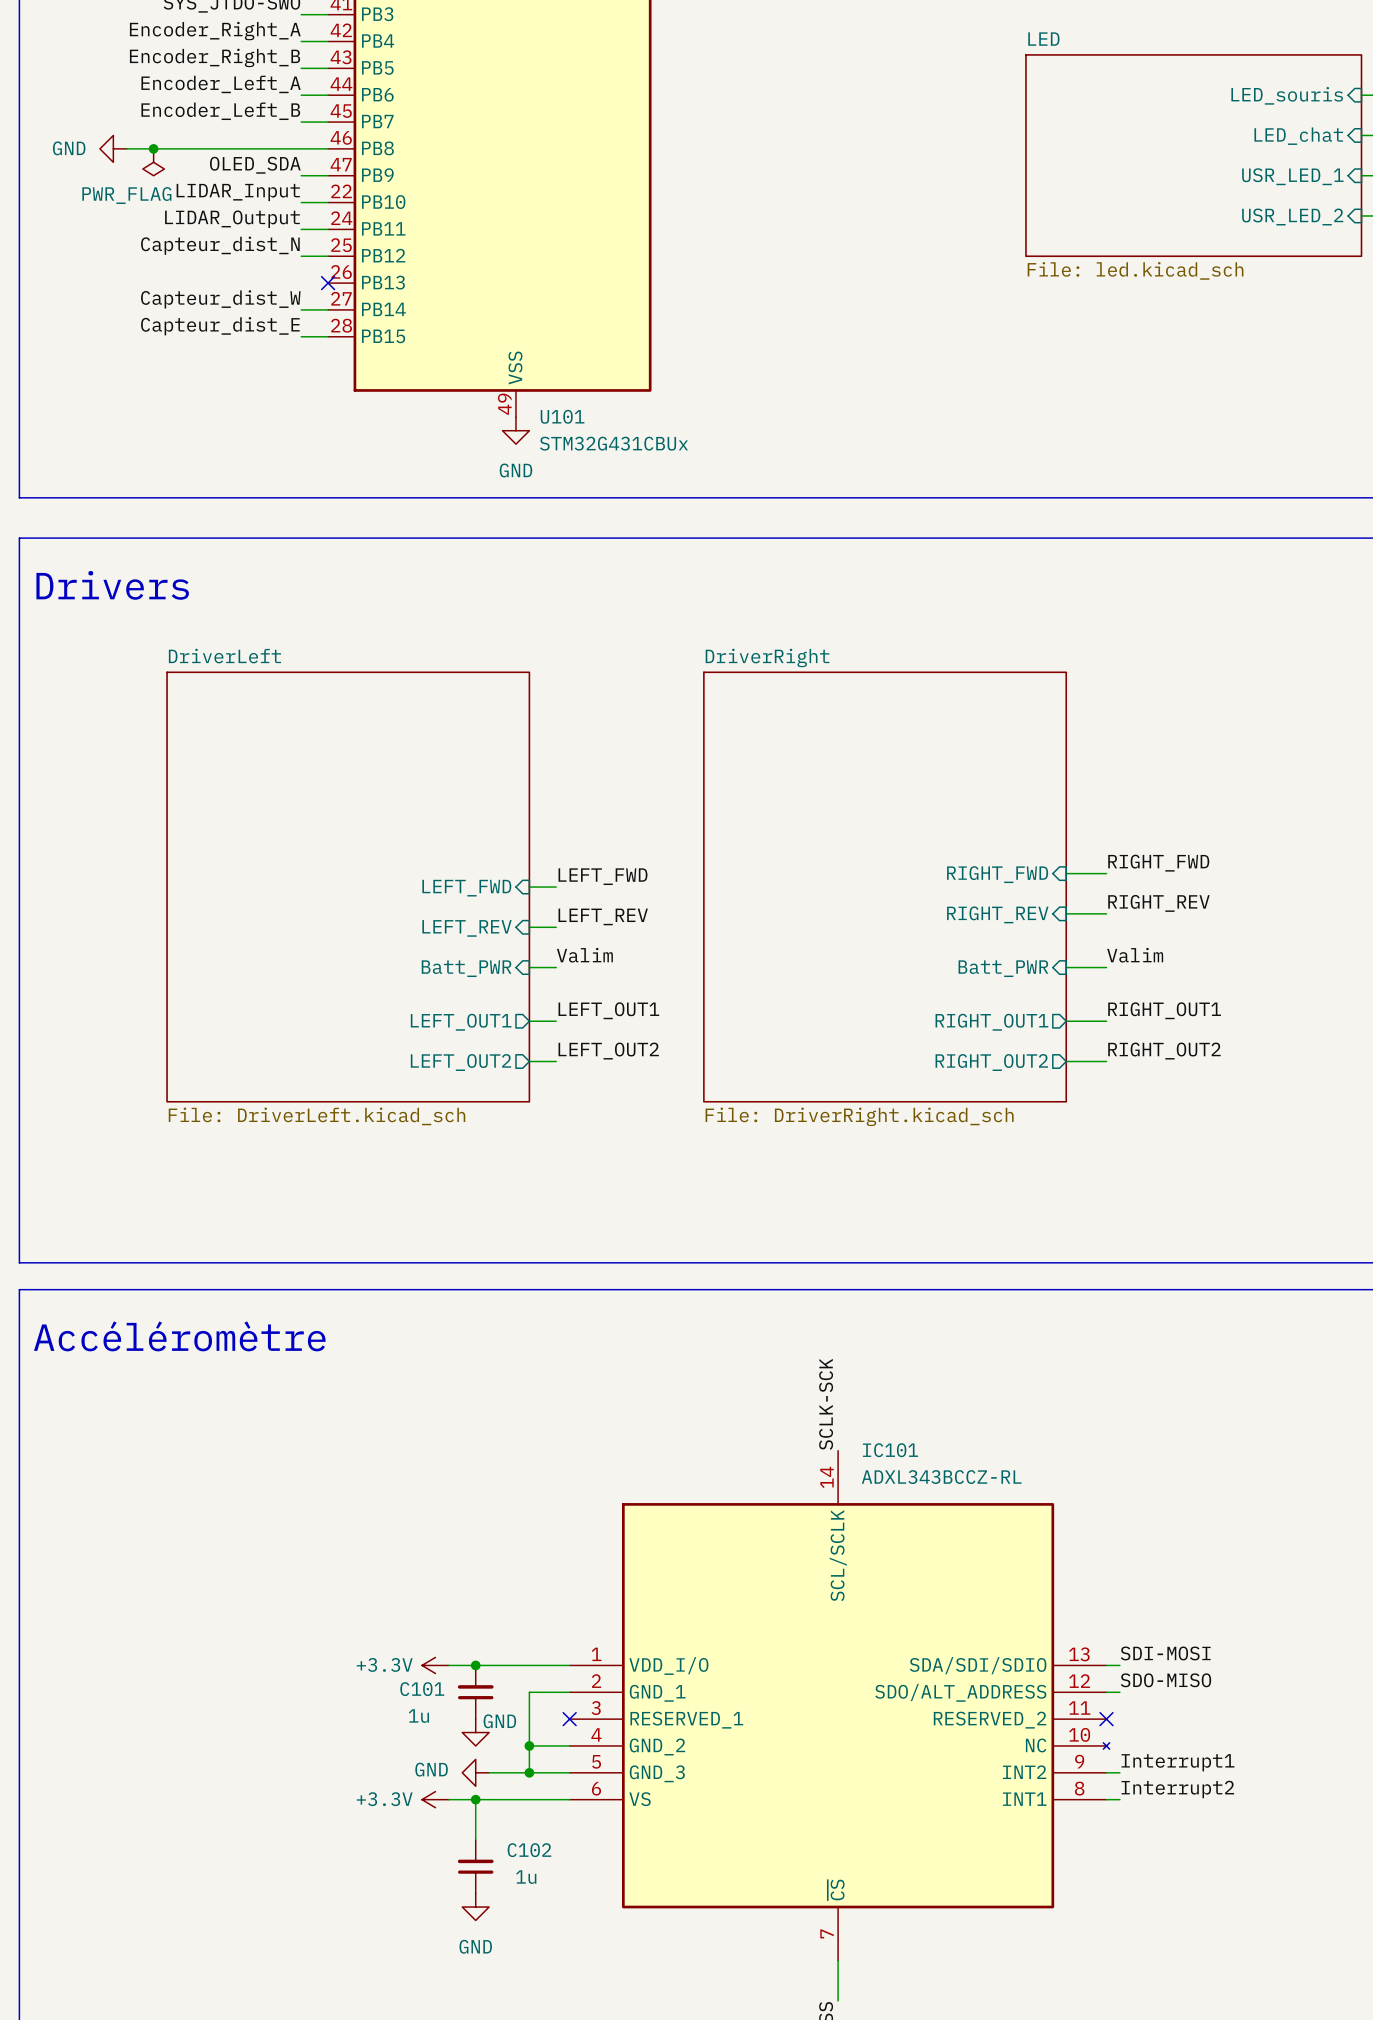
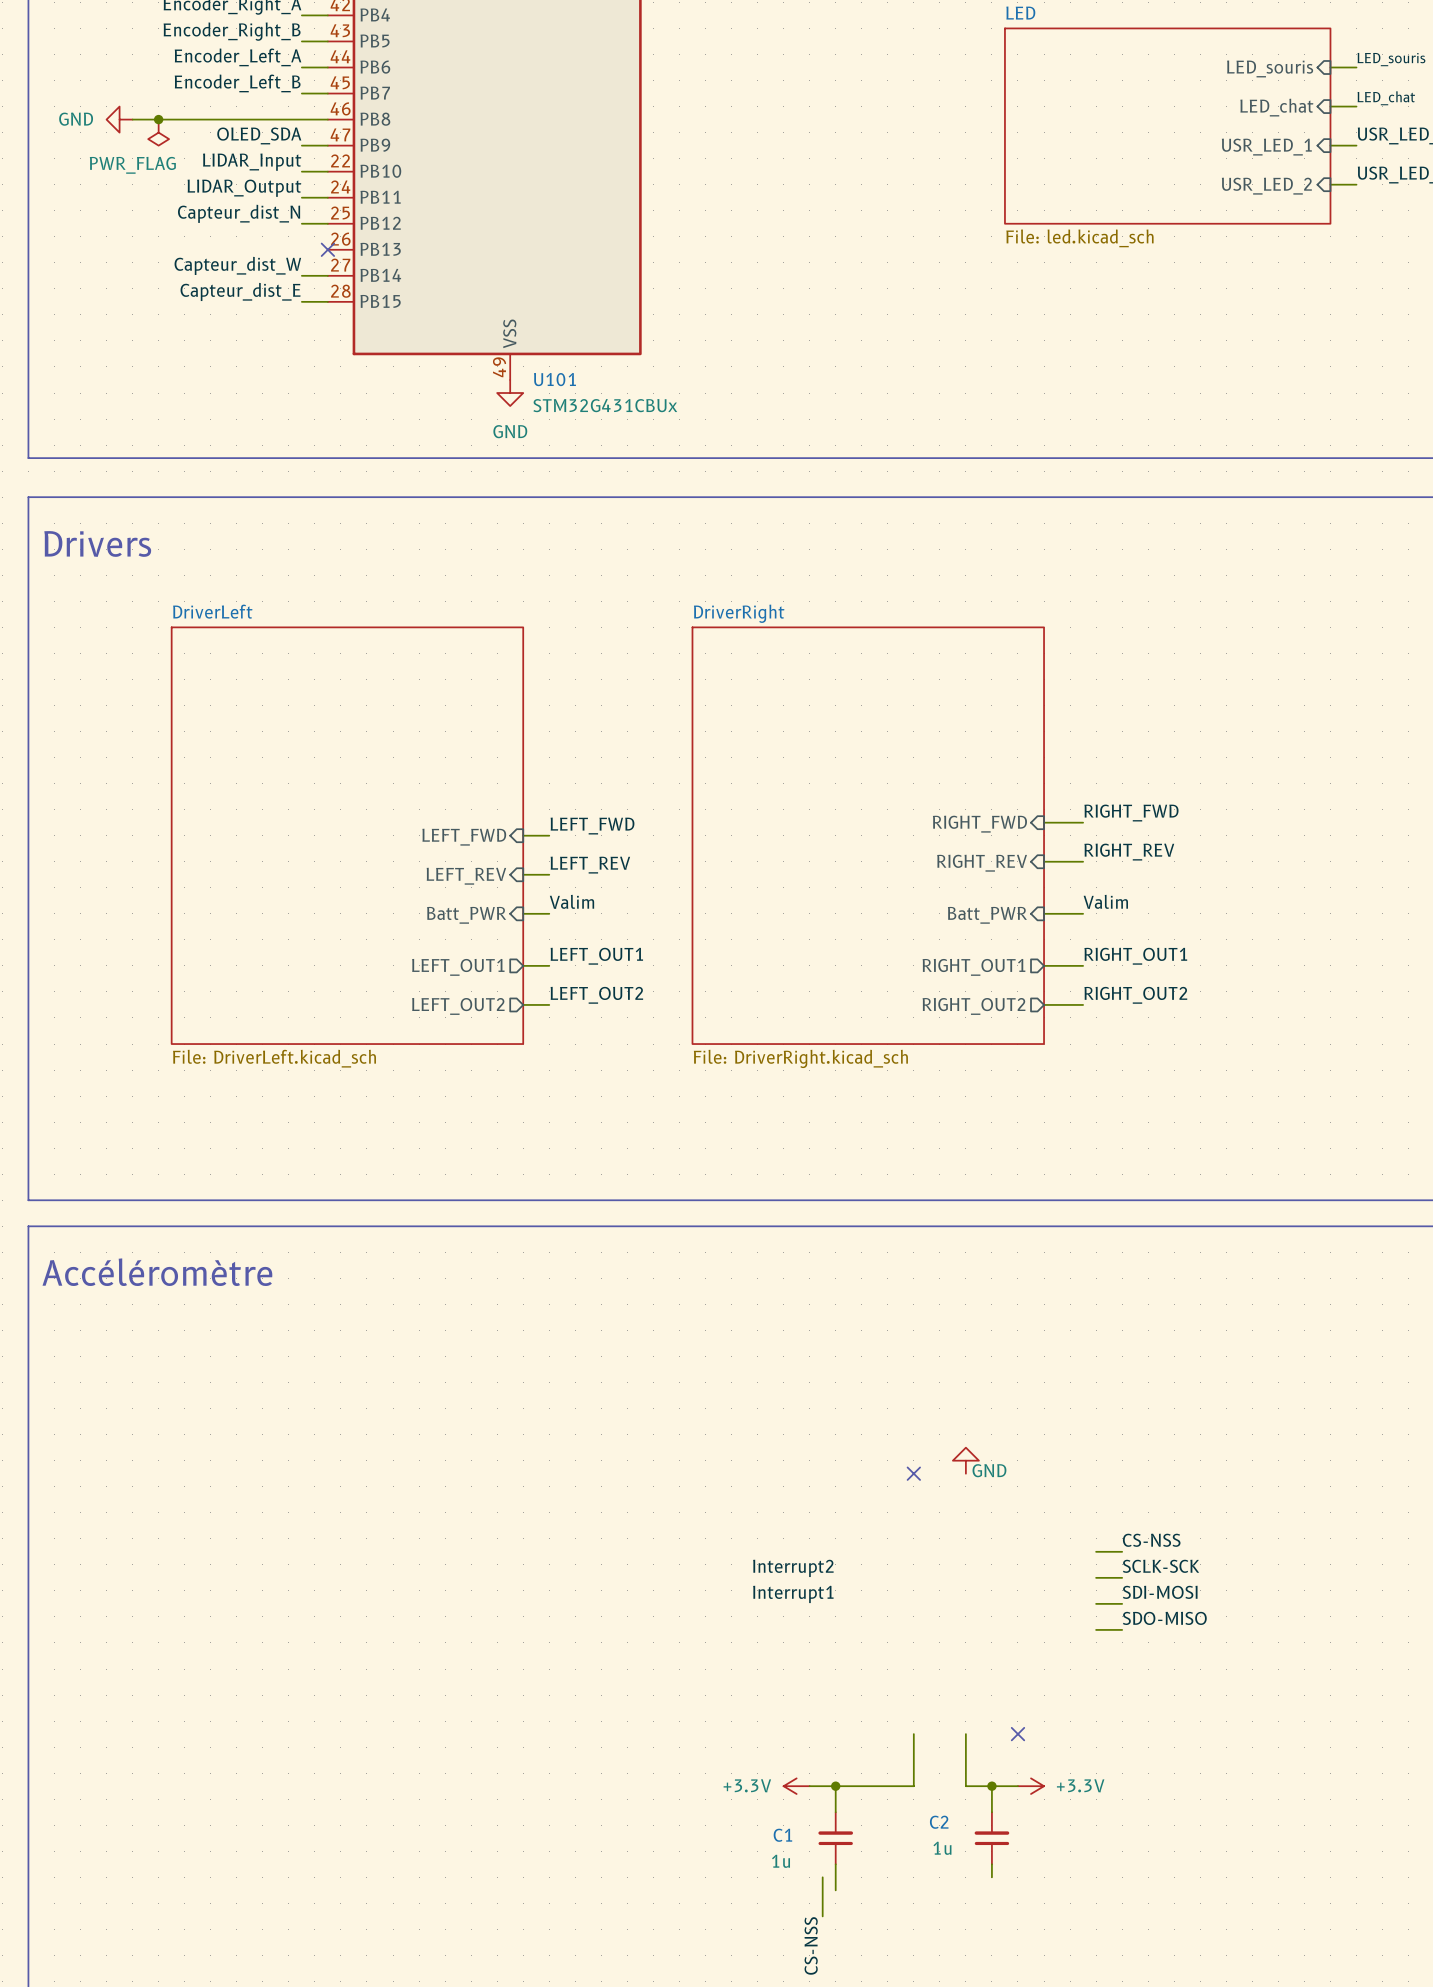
label: SCLK-SCK (826, 1404) -> none
power symbol: none -> GND (965, 1460)
no-connect mark: none -> (913, 1473)
label: none -> CS-NSS (1151, 1540)
wire: none -> (1096, 1551) (1122, 1551)
label: none -> SCLK-SCK (1161, 1566)
label: none -> Interrupt2 (793, 1568)
wire: none -> (1096, 1577) (1122, 1577)
label position: SDI-MOSI (1165, 1653) -> SDI-MOSI (1160, 1592)
power symbol: +3.3V (435, 1665) -> none
wire: (448, 1665) (569, 1665) -> none
junction: (475, 1665) -> none
wire: (1106, 1665) (1119, 1665) -> none
label: none -> Interrupt1 (793, 1594)
wire: none -> (1096, 1603) (1122, 1603)
label position: SDO-MISO (1165, 1680) -> SDO-MISO (1164, 1618)
C101: 1u (475, 1692) -> none
wire: (569, 1692) (529, 1692) (529, 1772) -> none
wire: (1106, 1692) (1119, 1692) -> none
IC101: ADXL343BCCZ-RL (839, 1705) -> none
wire: none -> (1096, 1629) (1122, 1629)
no-connect mark: (569, 1719) -> none
no-connect mark: (1106, 1719) -> none
power symbol: GND (475, 1732) -> none
wire: (529, 1745) (569, 1745) -> none
junction: (529, 1745) -> none
label: Interrupt1 (1177, 1762) -> none
power symbol: GND (475, 1772) -> none
wire: (489, 1772) (569, 1772) -> none
junction: (529, 1772) -> none
wire: (1106, 1772) (1119, 1772) -> none
label: Interrupt2 (1177, 1789) -> none
power symbol: +3.3V (435, 1799) -> none
wire: (448, 1799) (569, 1799) -> none
wire: (475, 1799) (475, 1839) -> none
junction: (475, 1799) -> none
wire: (1106, 1799) (1119, 1799) -> none
no-connect mark: none -> (1017, 1734)
C102: 1u (475, 1866) -> none
power symbol: none -> +3.3V (796, 1786)
junction: none -> (835, 1786)
junction: none -> (991, 1786)
power symbol: none -> +3.3V (1031, 1786)
power symbol: GND (475, 1907) -> none
C1: none -> 1u (835, 1838)
C2: none -> 1u (991, 1838)
wire: none -> (835, 1864) (835, 1890)
wire: none -> (991, 1864) (991, 1877)

